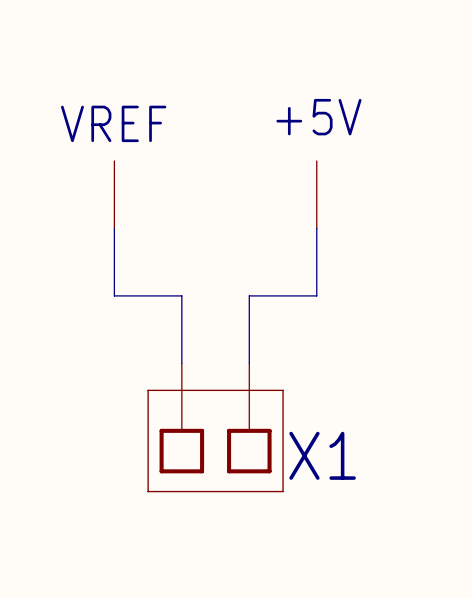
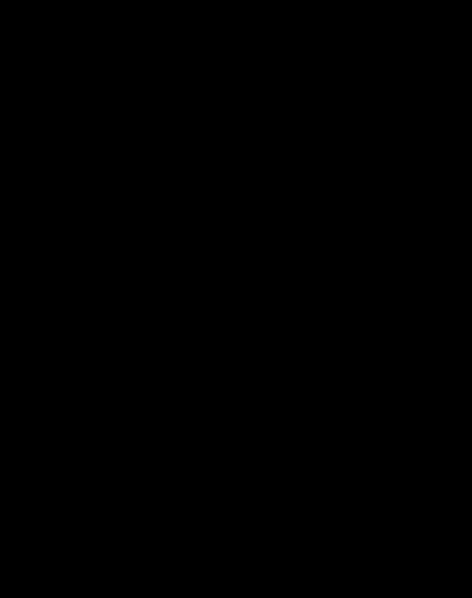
power symbol: VREF (114, 194) -> none
power symbol: +5V (316, 194) -> none
wire: (114, 228) (114, 295) (181, 295) (181, 363) -> none
wire: (316, 228) (316, 295) (249, 295) (249, 363) -> none
X1: (215, 427) -> none

